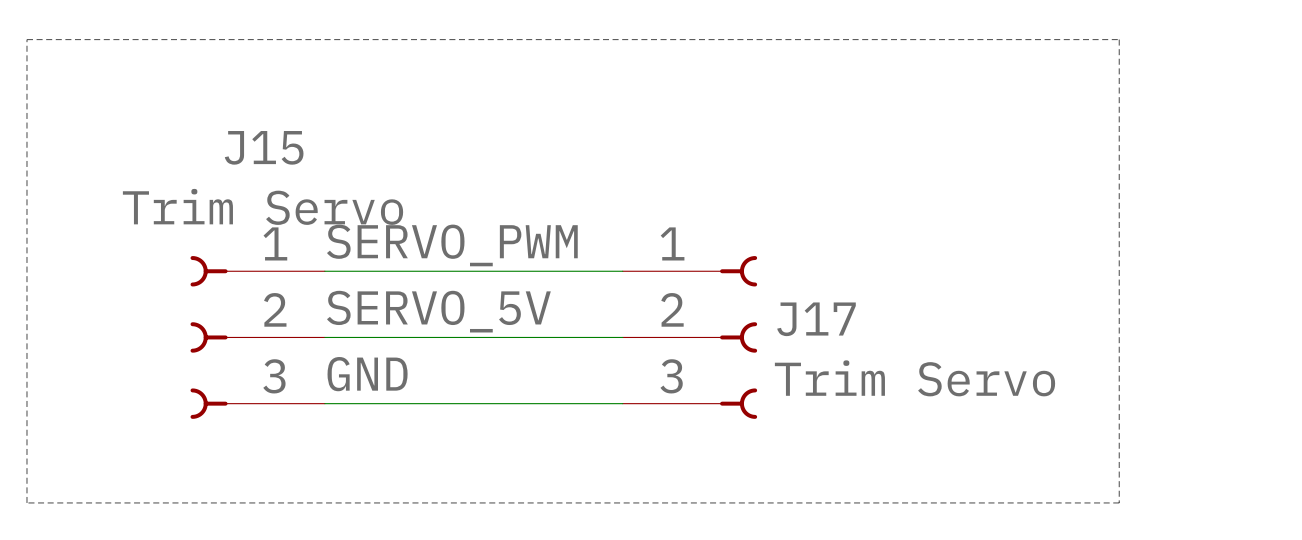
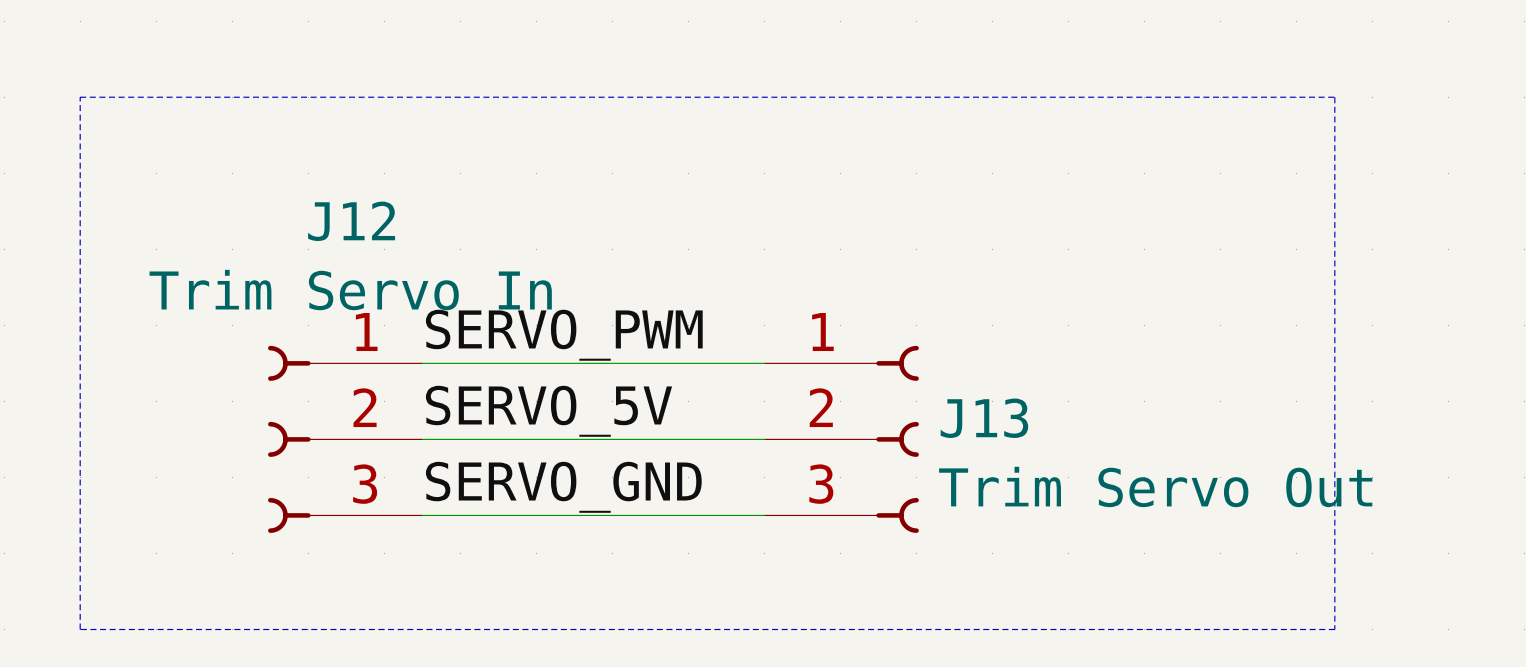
J15 name: J15 (264, 147) -> J12 (351, 221)
J15 value: Trim Servo (263, 206) -> Trim Servo In (350, 290)
J17 name: J17 (816, 319) -> J13 (984, 418)
label: GND (367, 374) -> SERVO_GND (563, 487)
J17 value: Trim Servo (915, 378) -> Trim Servo Out (1155, 486)

